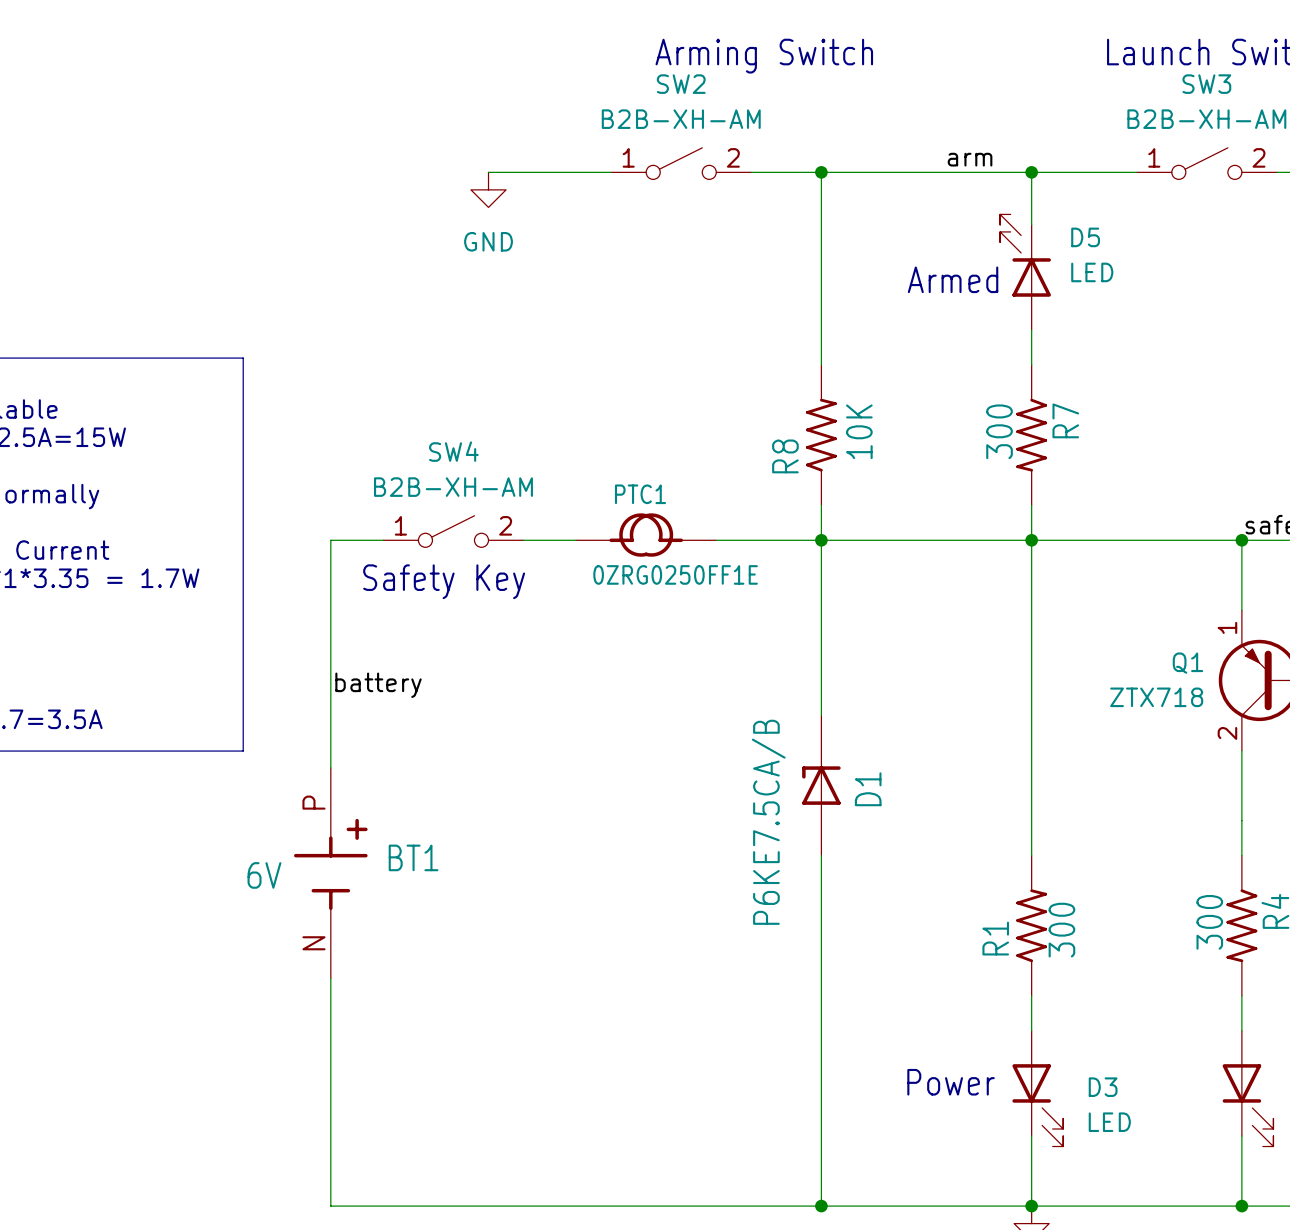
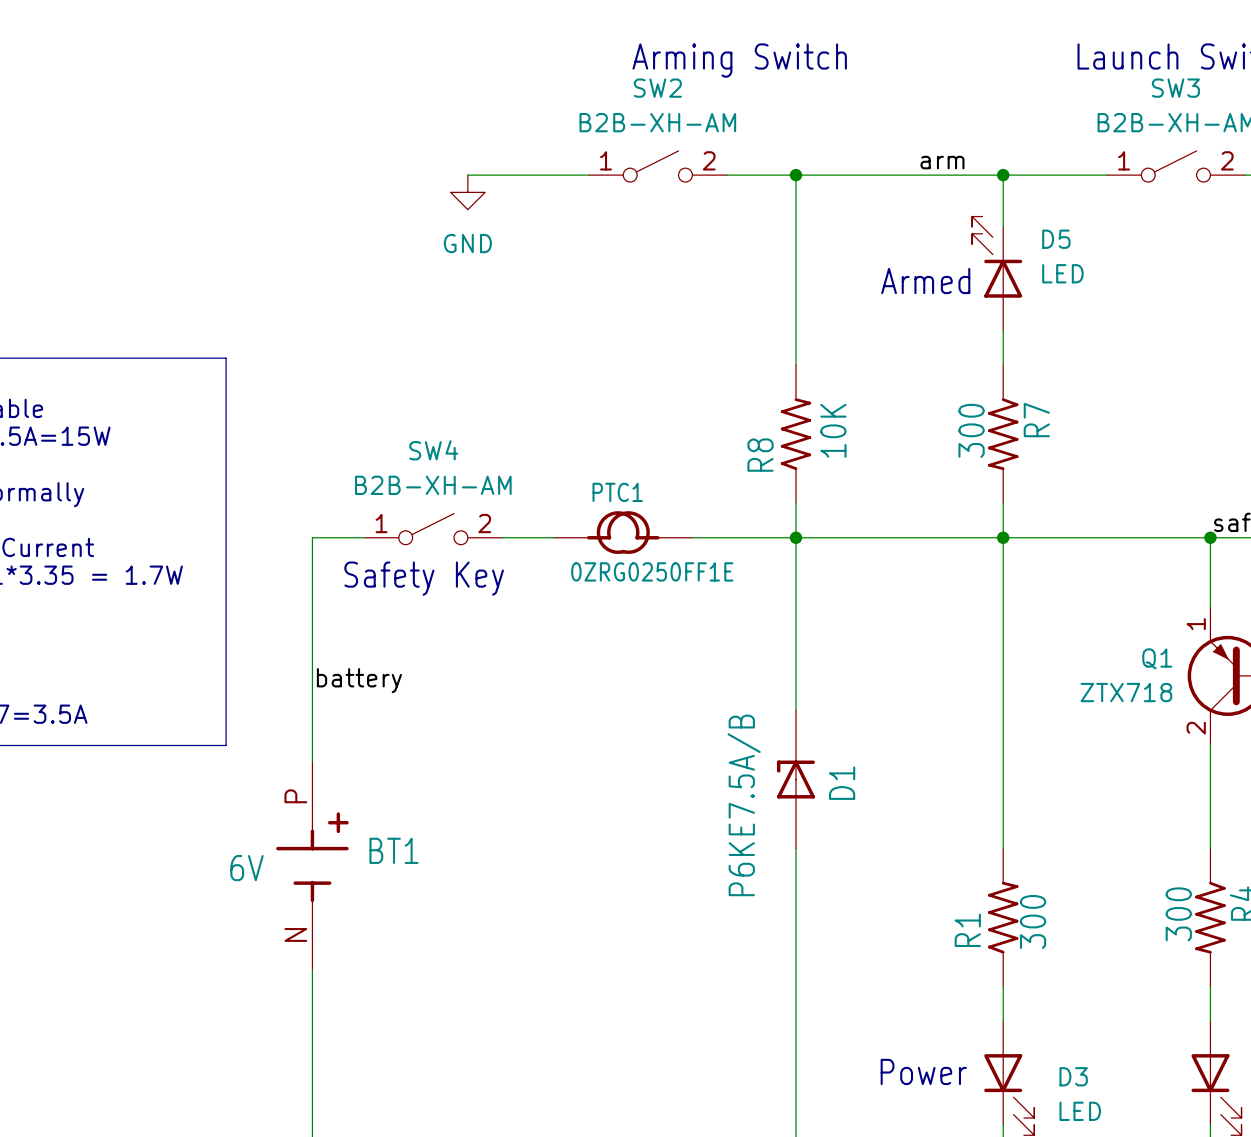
D1 value: P6KE7.5CA/B (768, 822) -> P6KE7.5A/B (744, 805)

